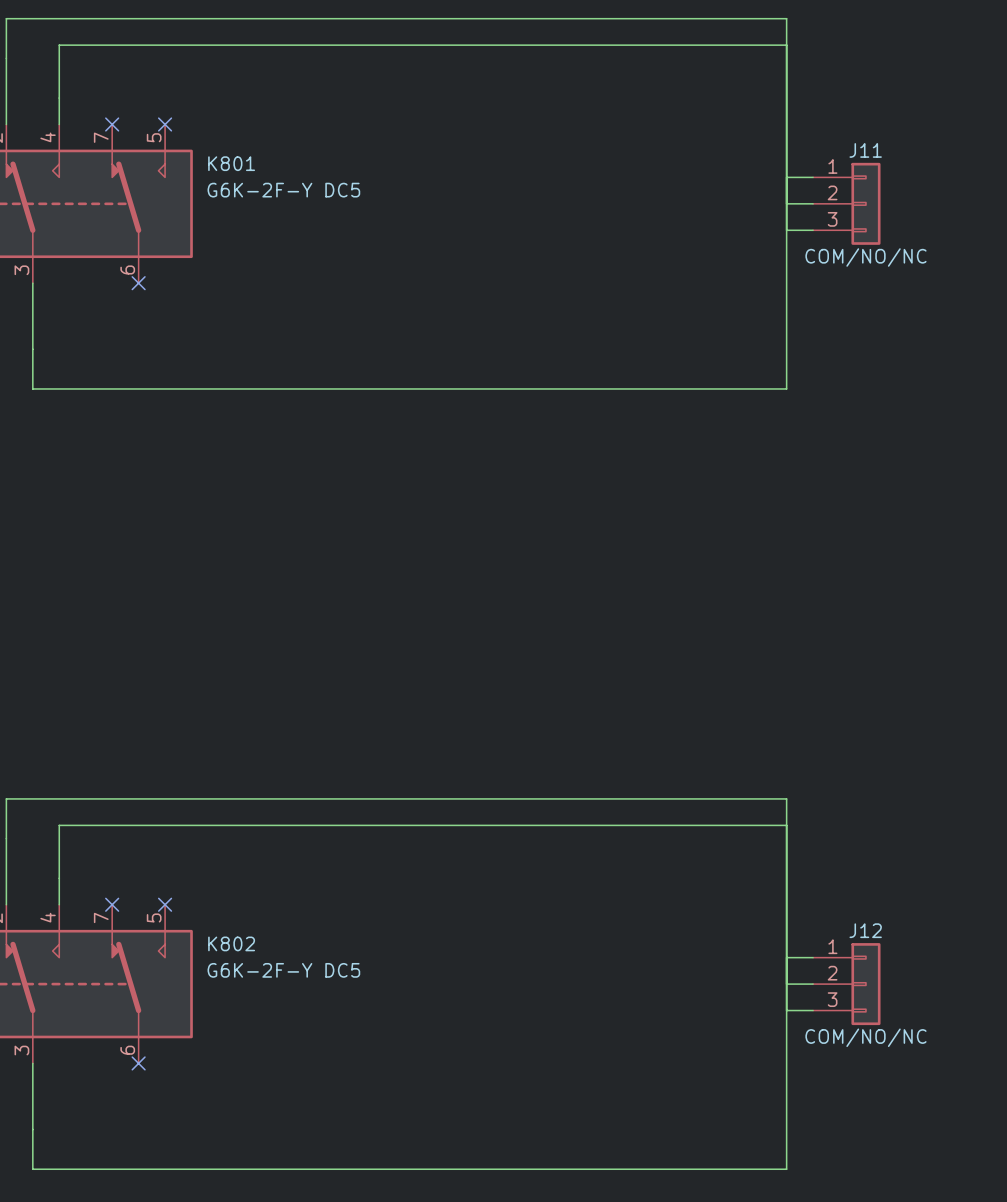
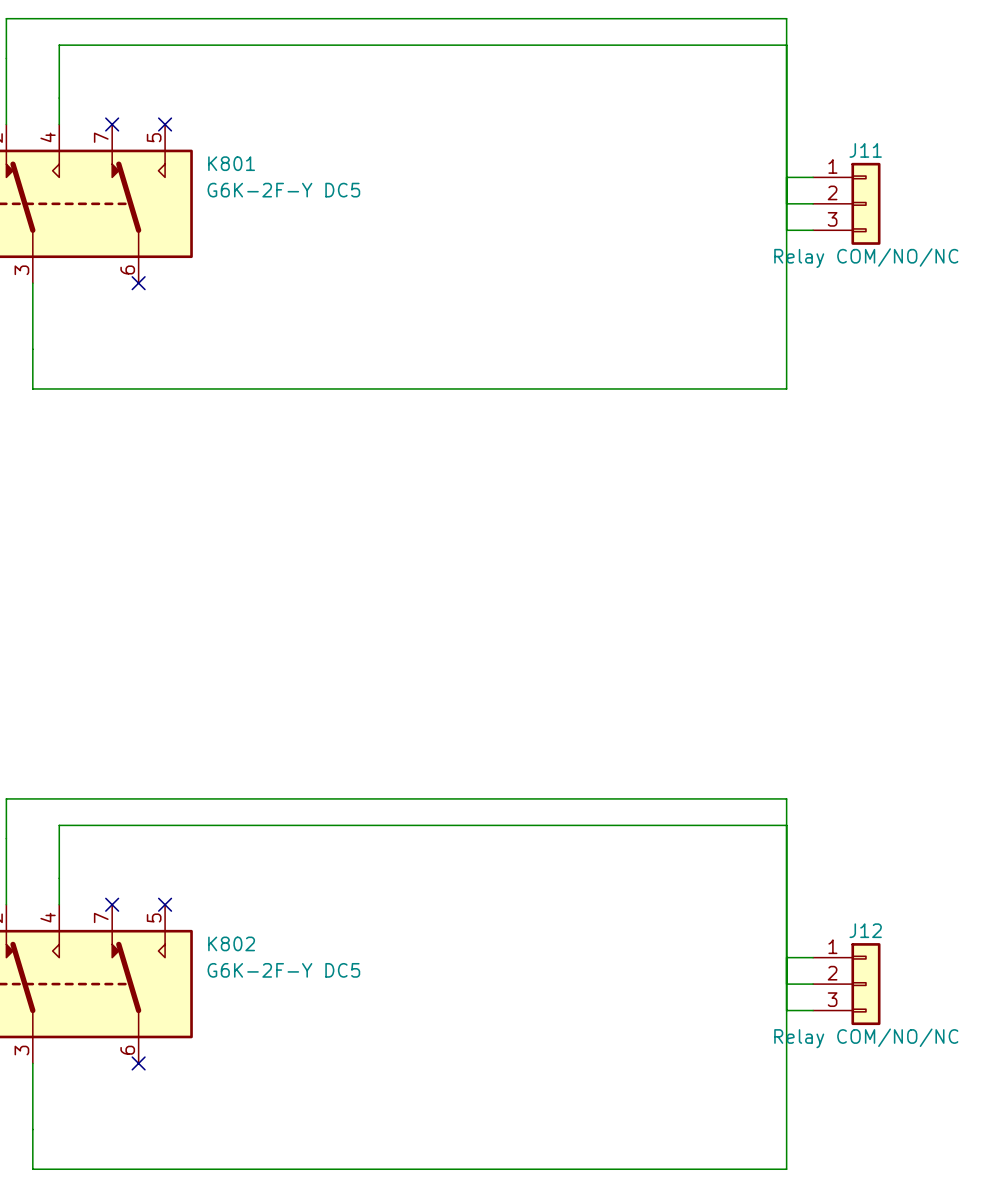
J11 value: COM/NO/NC (865, 257) -> Relay COM/NO/NC (866, 258)
J12 value: COM/NO/NC (865, 1037) -> Relay COM/NO/NC (866, 1038)

